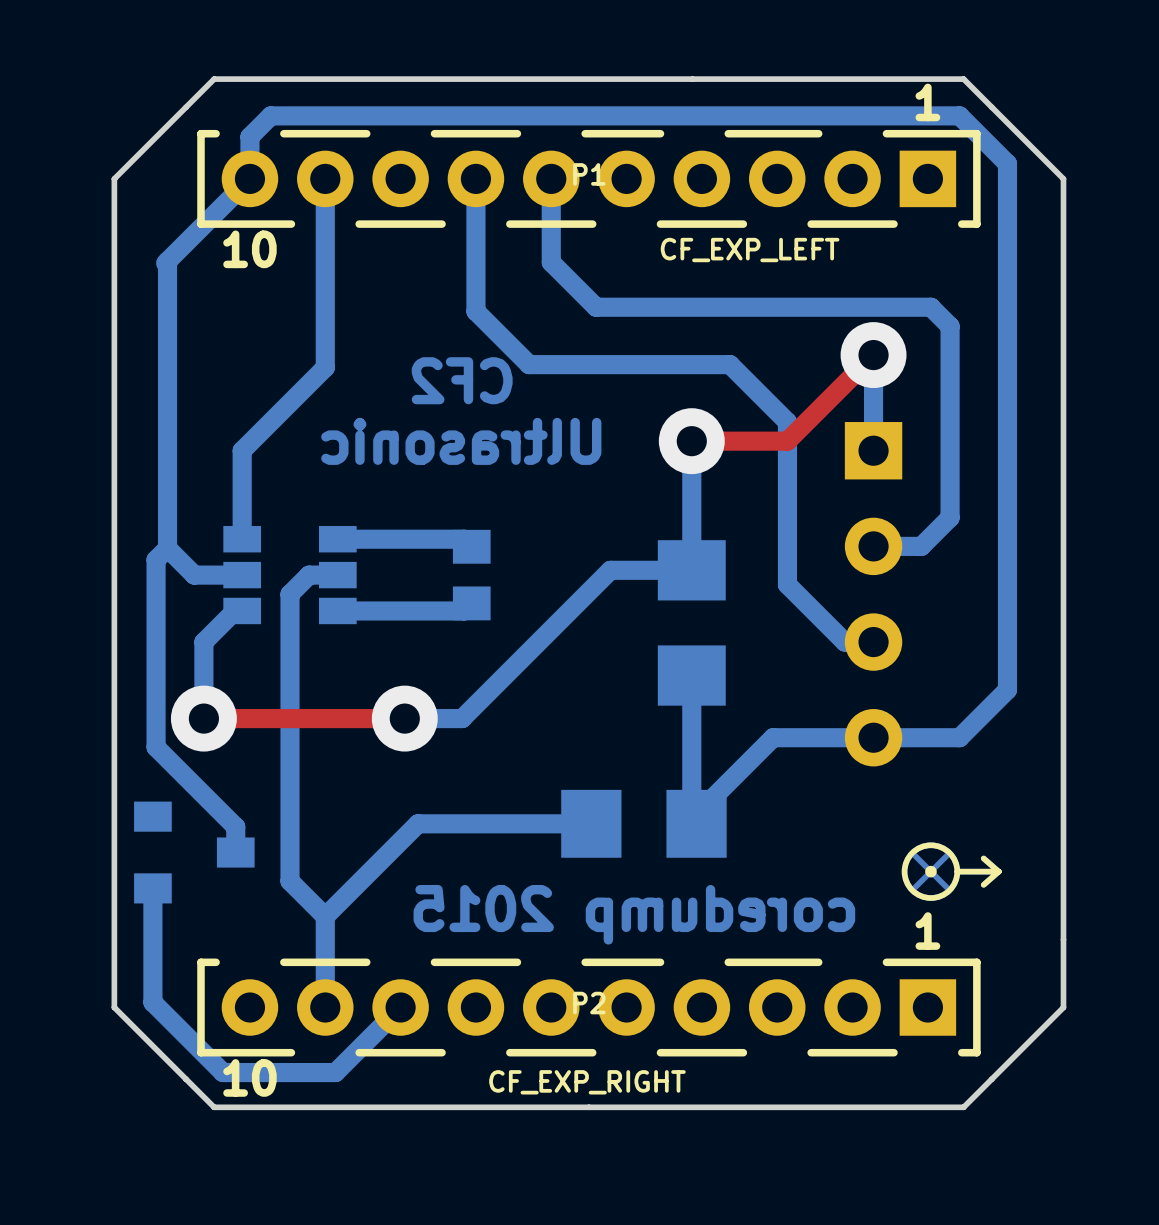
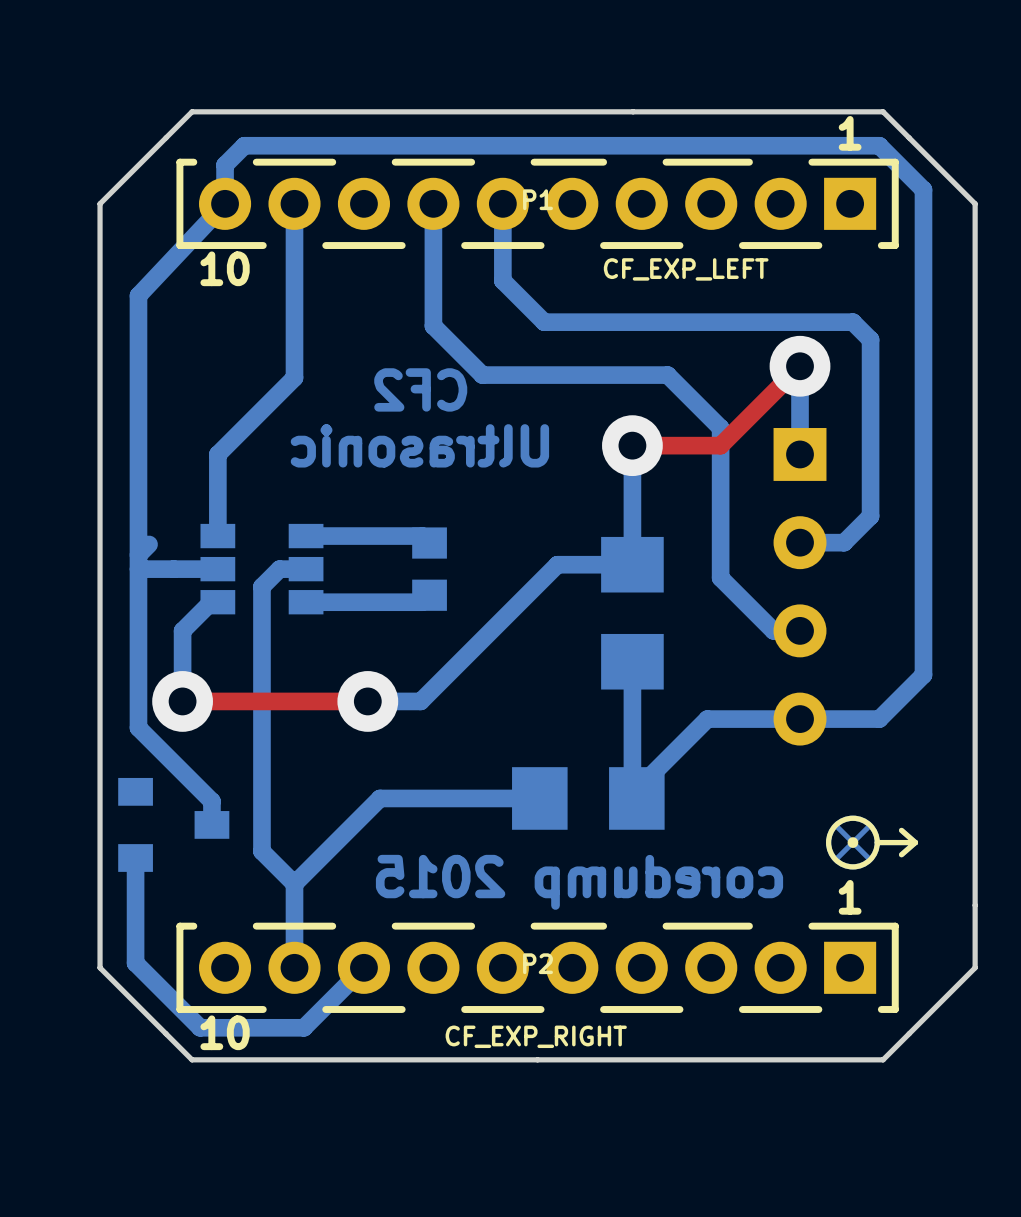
bottom track: (249, 178) (165, 263) -> (225, 203) (138, 295) (138, 555)
bottom track: (167, 261) (167, 548) (194, 575) -> (138, 569) (173, 569)

